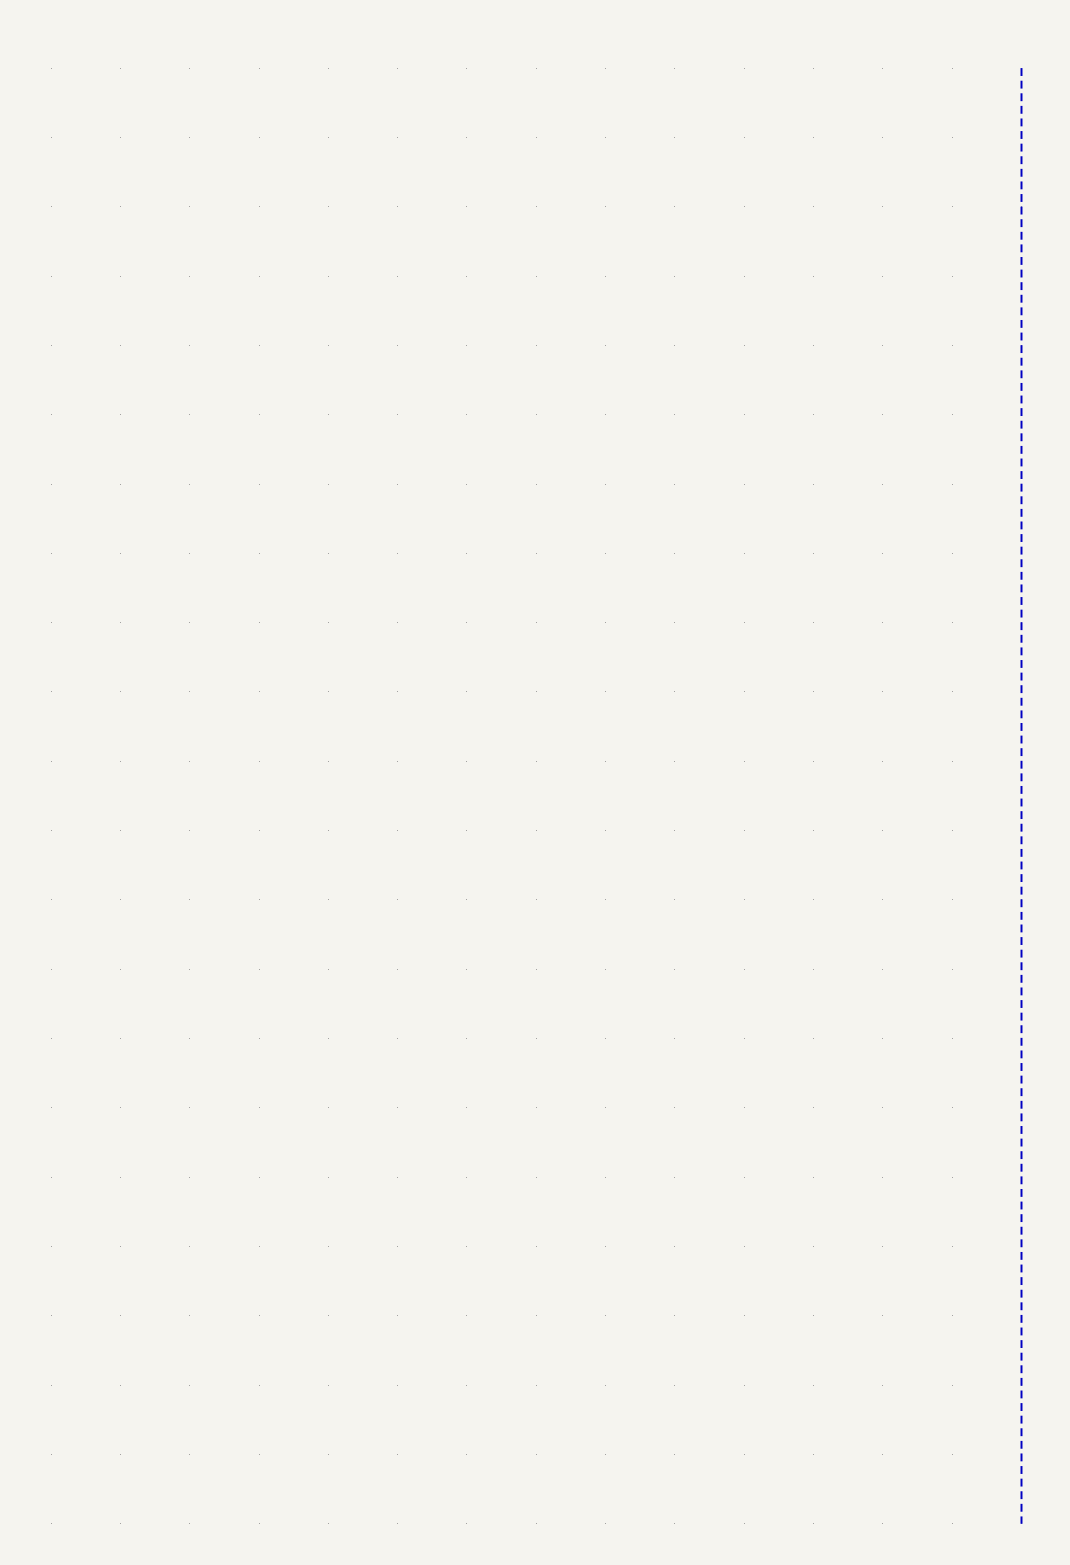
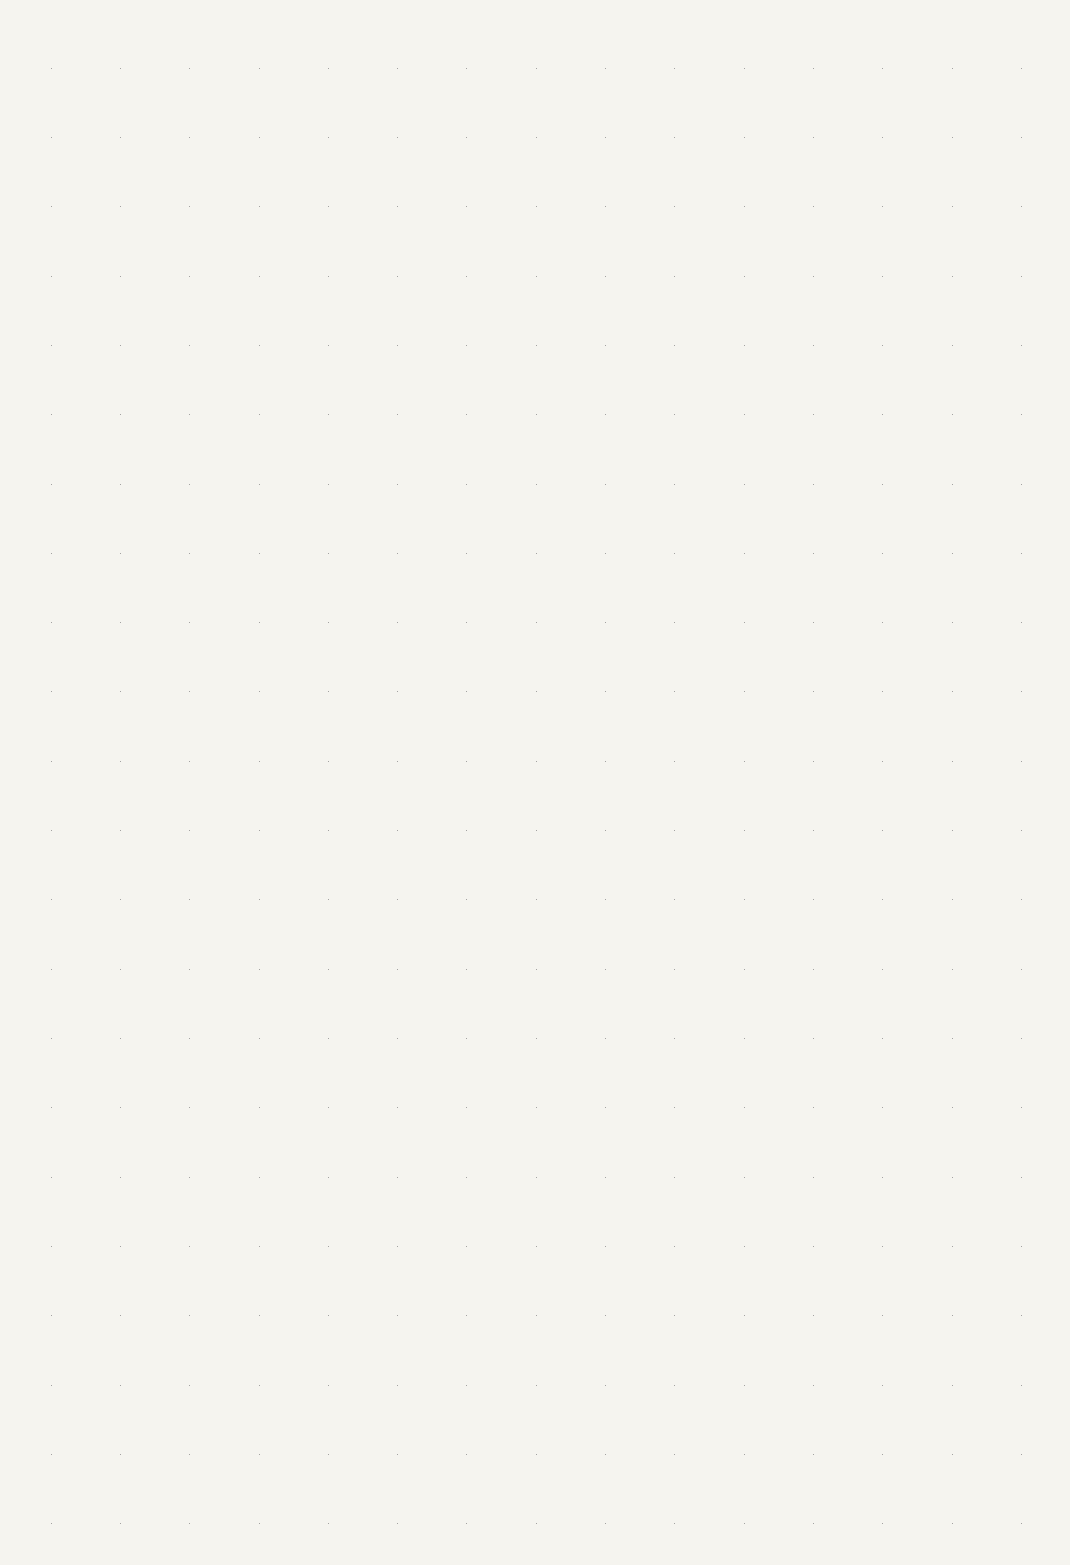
line: (1021, 68) (1021, 1523) -> none

